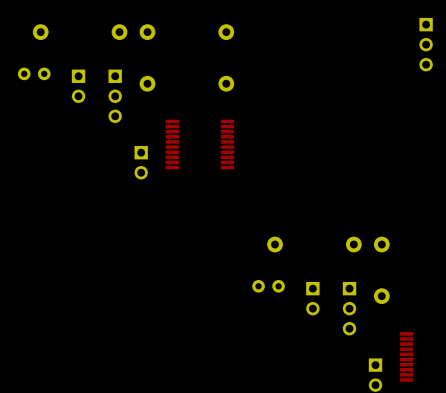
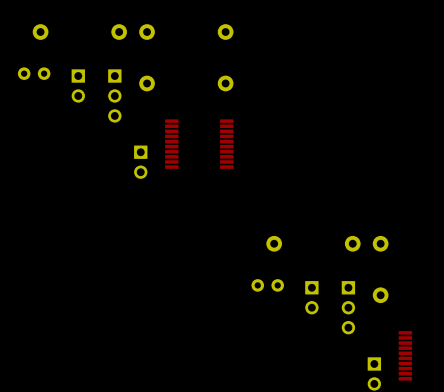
part: (426, 44) -> none

